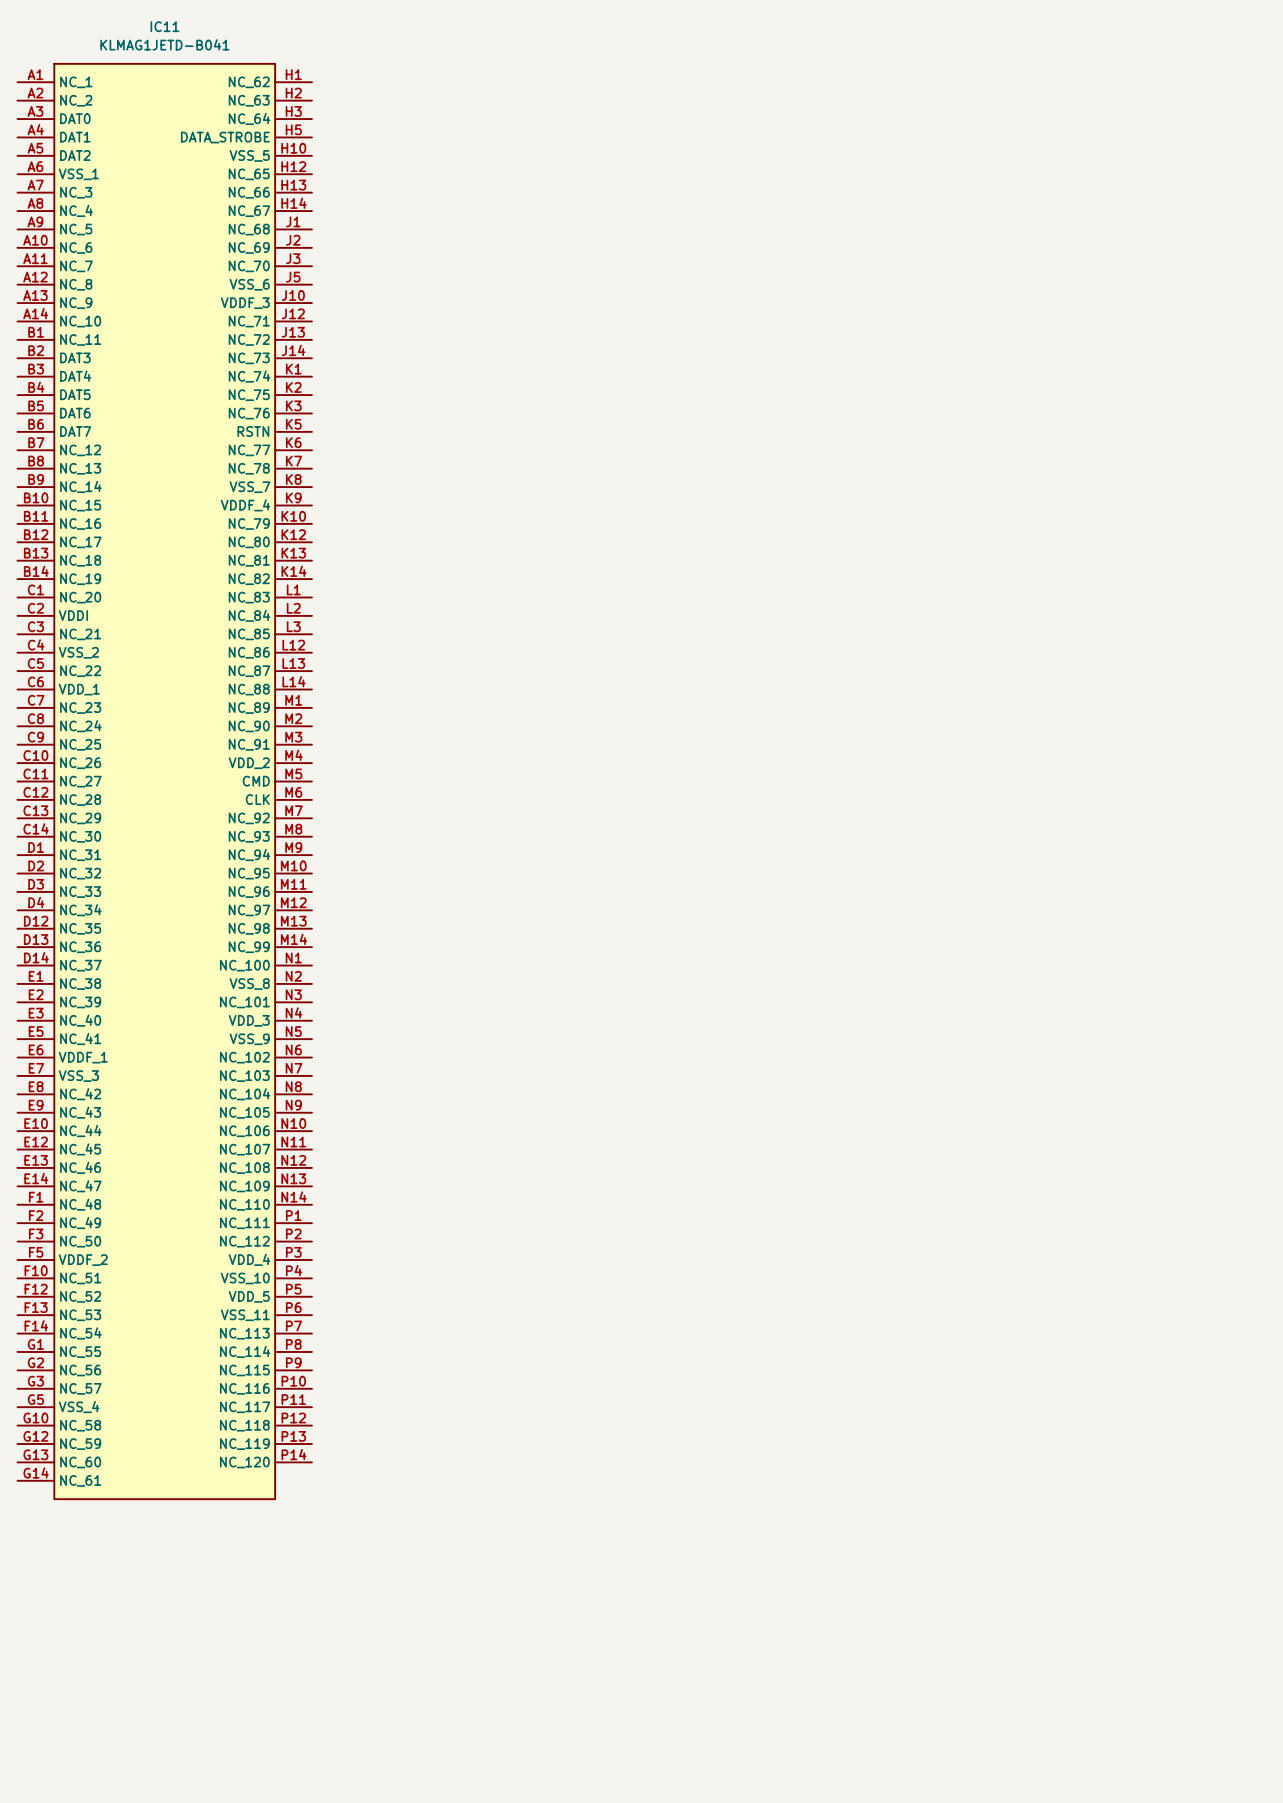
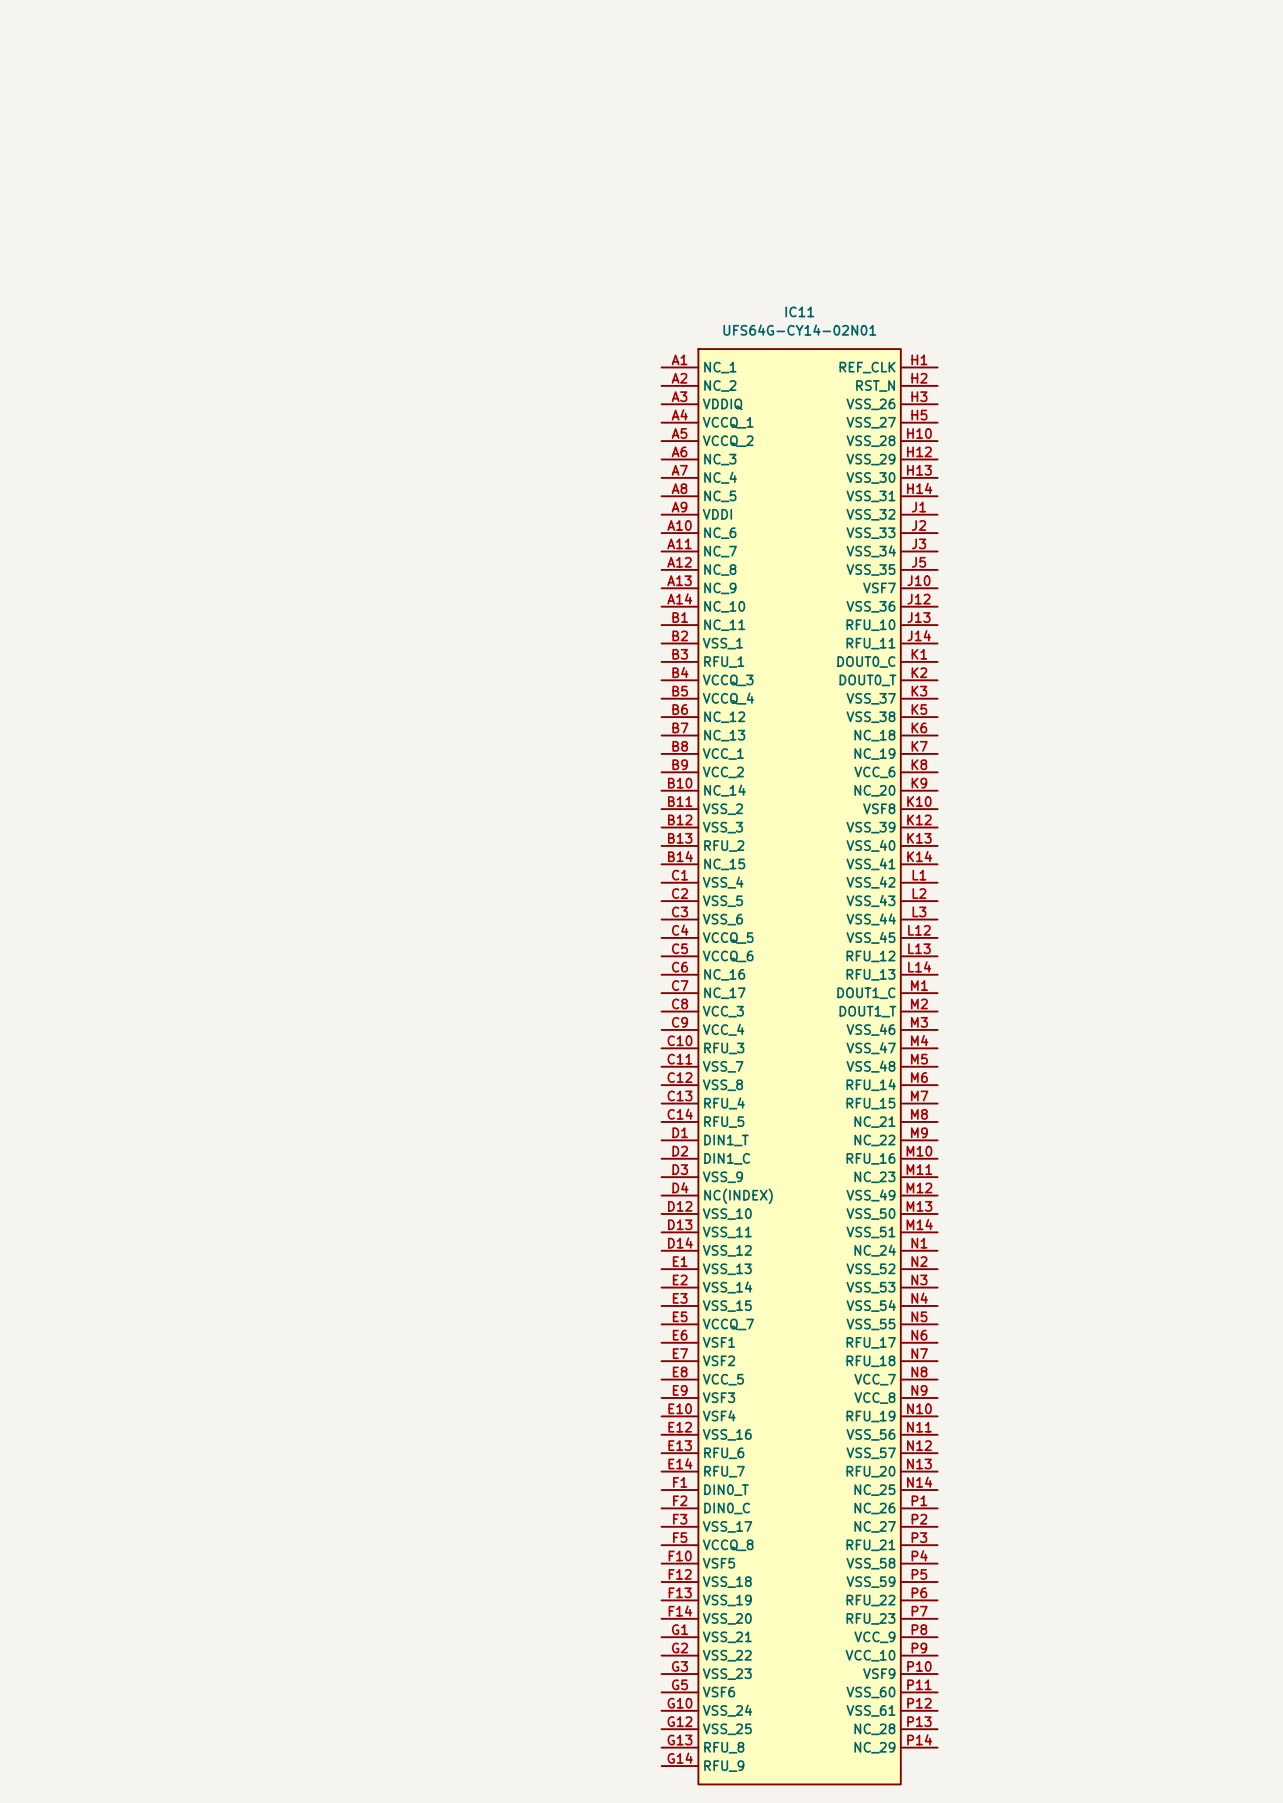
IC11 value: KLMAG1JETD-B041 (164, 44) -> UFS64G-CY14-02N01 (799, 330)
IC11 symbol: [17, 62, 312, 1501] -> [661, 348, 938, 1786]

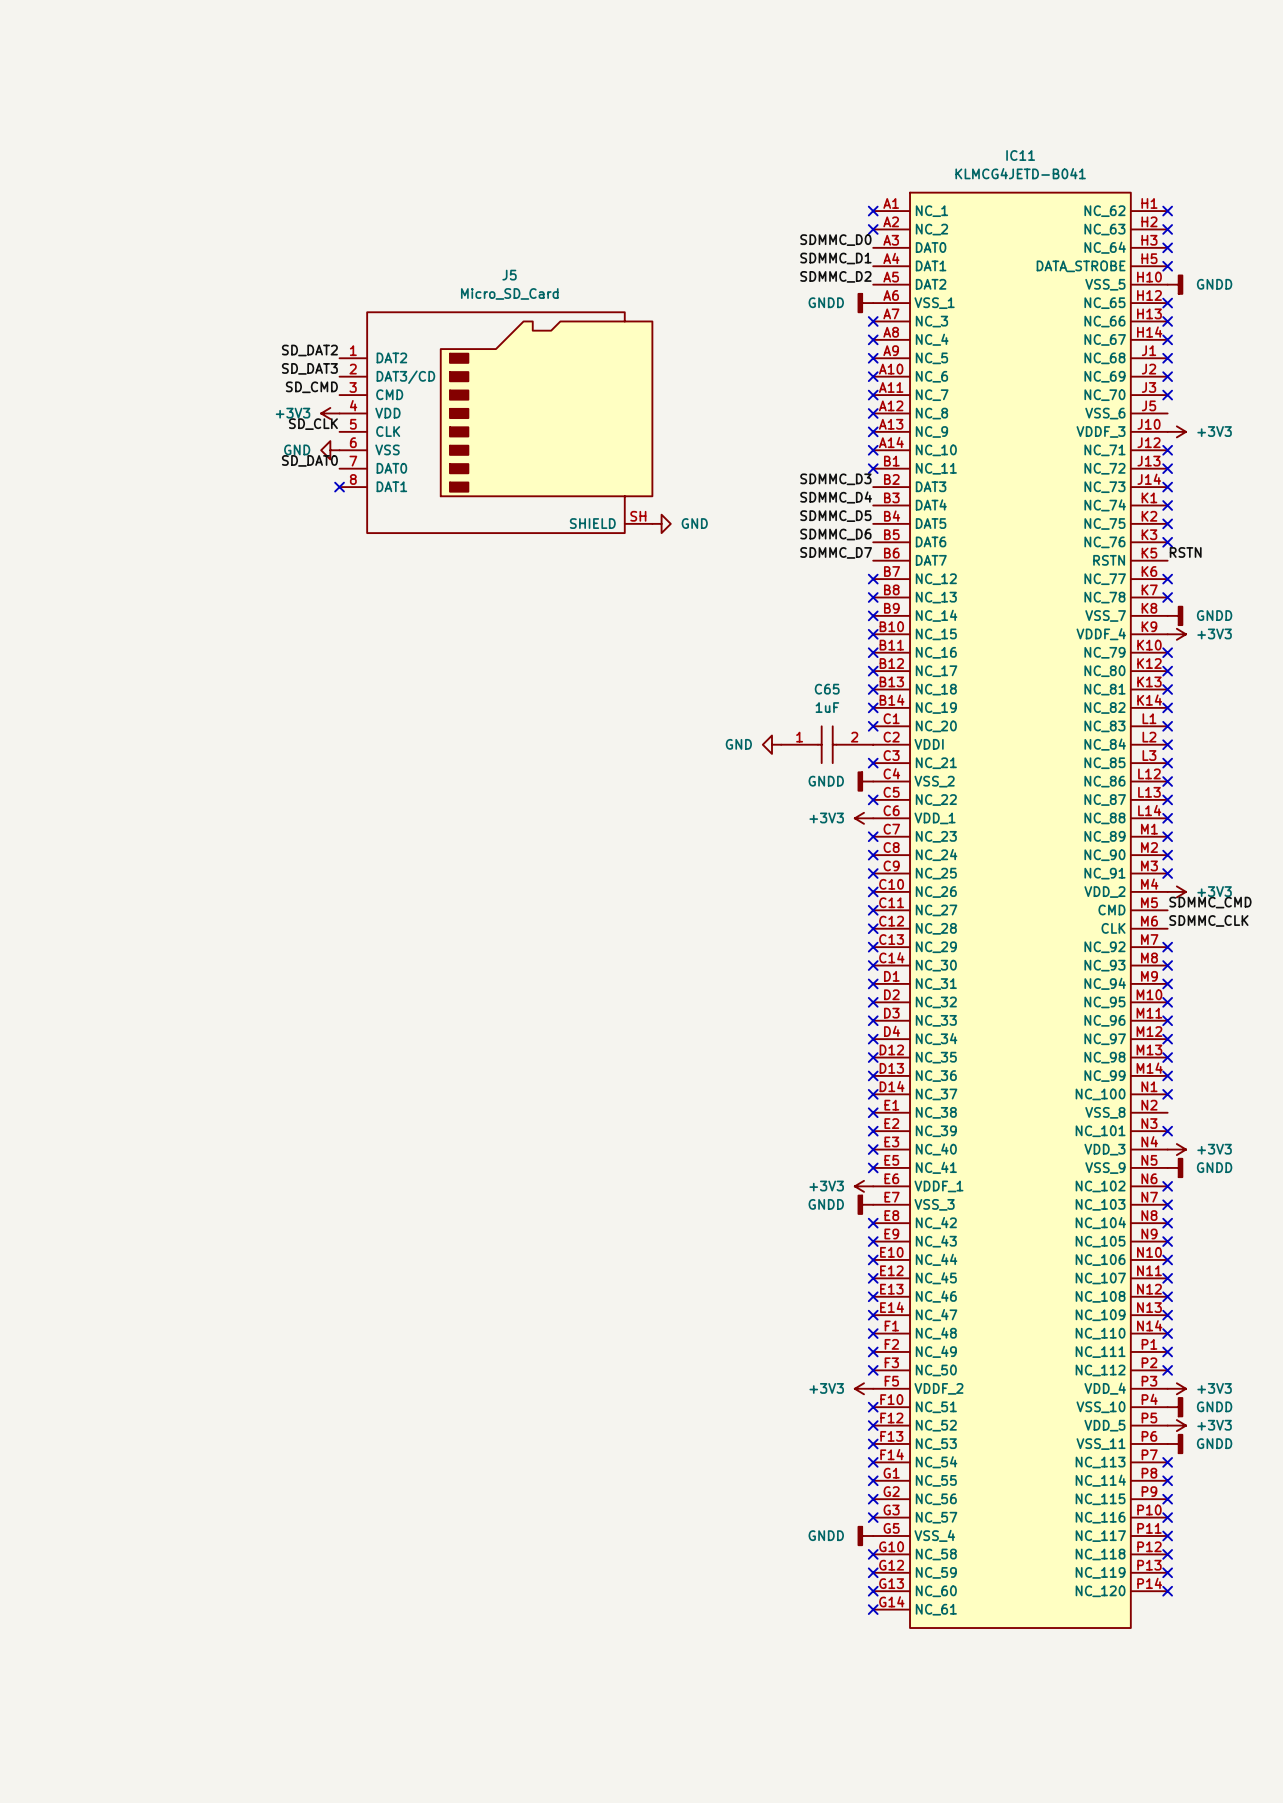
no-connect mark: none -> (873, 211)
no-connect mark: none -> (1167, 211)
no-connect mark: none -> (873, 229)
no-connect mark: none -> (1167, 229)
label: none -> SDMMC_D0 (835, 240)
no-connect mark: none -> (1167, 247)
label: none -> SDMMC_D1 (835, 258)
no-connect mark: none -> (1167, 266)
label: none -> SDMMC_D2 (835, 276)
power symbol: none -> GNDD (1175, 284)
power symbol: none -> GNDD (865, 303)
no-connect mark: none -> (1167, 303)
no-connect mark: none -> (873, 321)
no-connect mark: none -> (1167, 321)
IC11 value: UFS64G-CY14-02N01 (799, 330) -> KLMCG4JETD-B041 (1020, 173)
no-connect mark: none -> (873, 339)
no-connect mark: none -> (1167, 339)
IC11 symbol: [661, 348, 938, 1786] -> [873, 191, 1168, 1629]
label: none -> SD_DAT2 (309, 350)
no-connect mark: none -> (873, 358)
no-connect mark: none -> (1167, 358)
label: none -> SD_DAT3 (309, 368)
no-connect mark: none -> (873, 376)
no-connect mark: none -> (1167, 376)
label: none -> SD_CMD (311, 387)
no-connect mark: none -> (873, 395)
no-connect mark: none -> (1167, 395)
power symbol: none -> +3V3 (330, 413)
no-connect mark: none -> (873, 413)
J5: none -> Micro_SD_Card (496, 422)
label: none -> SD_CLK (313, 424)
no-connect mark: none -> (873, 431)
power symbol: none -> +3V3 (1176, 431)
power symbol: none -> GND (330, 450)
no-connect mark: none -> (873, 450)
no-connect mark: none -> (1167, 450)
label: none -> SD_DAT0 (309, 460)
no-connect mark: none -> (873, 468)
no-connect mark: none -> (1167, 468)
label: none -> SDMMC_D3 (835, 479)
no-connect mark: none -> (339, 487)
no-connect mark: none -> (1167, 487)
label: none -> SDMMC_D4 (836, 497)
no-connect mark: none -> (1167, 505)
label: none -> SDMMC_D5 (835, 516)
power symbol: none -> GND (661, 523)
no-connect mark: none -> (1167, 523)
label: none -> SDMMC_D6 (835, 534)
no-connect mark: none -> (1167, 542)
label: none -> SDMMC_D7 (836, 552)
label: none -> RSTN (1185, 552)
no-connect mark: none -> (873, 579)
no-connect mark: none -> (1167, 579)
no-connect mark: none -> (873, 597)
no-connect mark: none -> (1167, 597)
no-connect mark: none -> (873, 615)
power symbol: none -> GNDD (1175, 615)
no-connect mark: none -> (873, 634)
power symbol: none -> +3V3 (1176, 634)
no-connect mark: none -> (873, 652)
no-connect mark: none -> (1167, 652)
no-connect mark: none -> (873, 671)
no-connect mark: none -> (1167, 671)
no-connect mark: none -> (873, 689)
no-connect mark: none -> (1167, 689)
no-connect mark: none -> (873, 707)
no-connect mark: none -> (1167, 707)
no-connect mark: none -> (873, 726)
no-connect mark: none -> (1167, 726)
power symbol: none -> GND (771, 744)
C65: none -> 1uF (827, 744)
no-connect mark: none -> (1167, 744)
no-connect mark: none -> (873, 763)
no-connect mark: none -> (1167, 763)
power symbol: none -> GNDD (865, 781)
no-connect mark: none -> (1167, 781)
no-connect mark: none -> (873, 799)
no-connect mark: none -> (1167, 799)
power symbol: none -> +3V3 (864, 818)
no-connect mark: none -> (1167, 818)
no-connect mark: none -> (873, 836)
no-connect mark: none -> (1167, 836)
no-connect mark: none -> (873, 855)
no-connect mark: none -> (1167, 855)
no-connect mark: none -> (873, 873)
no-connect mark: none -> (1167, 873)
no-connect mark: none -> (873, 891)
power symbol: none -> +3V3 (1176, 891)
label: none -> SDMMC_CMD (1210, 902)
no-connect mark: none -> (873, 910)
label: none -> SDMMC_CLK (1208, 920)
no-connect mark: none -> (873, 928)
no-connect mark: none -> (873, 947)
no-connect mark: none -> (1167, 947)
no-connect mark: none -> (873, 965)
no-connect mark: none -> (1167, 965)
no-connect mark: none -> (873, 983)
no-connect mark: none -> (1167, 983)
no-connect mark: none -> (873, 1002)
no-connect mark: none -> (1167, 1002)
no-connect mark: none -> (873, 1020)
no-connect mark: none -> (1167, 1020)
no-connect mark: none -> (873, 1039)
no-connect mark: none -> (1167, 1039)
no-connect mark: none -> (873, 1057)
no-connect mark: none -> (1167, 1057)
no-connect mark: none -> (873, 1075)
no-connect mark: none -> (1167, 1075)
no-connect mark: none -> (873, 1094)
no-connect mark: none -> (1167, 1094)
no-connect mark: none -> (873, 1112)
no-connect mark: none -> (873, 1131)
no-connect mark: none -> (1167, 1131)
no-connect mark: none -> (873, 1149)
power symbol: none -> +3V3 (1176, 1149)
no-connect mark: none -> (873, 1167)
power symbol: none -> GNDD (1175, 1167)
power symbol: none -> +3V3 (864, 1186)
no-connect mark: none -> (1167, 1186)
power symbol: none -> GNDD (865, 1204)
no-connect mark: none -> (1167, 1204)
no-connect mark: none -> (873, 1223)
no-connect mark: none -> (1167, 1223)
no-connect mark: none -> (873, 1241)
no-connect mark: none -> (1167, 1241)
no-connect mark: none -> (873, 1259)
no-connect mark: none -> (1167, 1259)
no-connect mark: none -> (873, 1278)
no-connect mark: none -> (1167, 1278)
no-connect mark: none -> (873, 1296)
no-connect mark: none -> (1167, 1296)
no-connect mark: none -> (873, 1315)
no-connect mark: none -> (1167, 1315)
no-connect mark: none -> (873, 1333)
no-connect mark: none -> (1167, 1333)
no-connect mark: none -> (873, 1351)
no-connect mark: none -> (1167, 1351)
no-connect mark: none -> (873, 1370)
no-connect mark: none -> (1167, 1370)
power symbol: none -> +3V3 (864, 1388)
power symbol: none -> +3V3 (1176, 1388)
no-connect mark: none -> (873, 1407)
power symbol: none -> GNDD (1175, 1407)
no-connect mark: none -> (873, 1425)
power symbol: none -> +3V3 (1176, 1425)
no-connect mark: none -> (873, 1443)
power symbol: none -> GNDD (1175, 1443)
no-connect mark: none -> (873, 1462)
no-connect mark: none -> (1167, 1462)
no-connect mark: none -> (873, 1480)
no-connect mark: none -> (1167, 1480)
no-connect mark: none -> (873, 1499)
no-connect mark: none -> (1167, 1499)
no-connect mark: none -> (873, 1517)
no-connect mark: none -> (1167, 1517)
power symbol: none -> GNDD (865, 1536)
no-connect mark: none -> (1167, 1536)
no-connect mark: none -> (873, 1554)
no-connect mark: none -> (1167, 1554)
no-connect mark: none -> (873, 1572)
no-connect mark: none -> (1167, 1572)
no-connect mark: none -> (873, 1591)
no-connect mark: none -> (1167, 1591)
no-connect mark: none -> (873, 1609)

